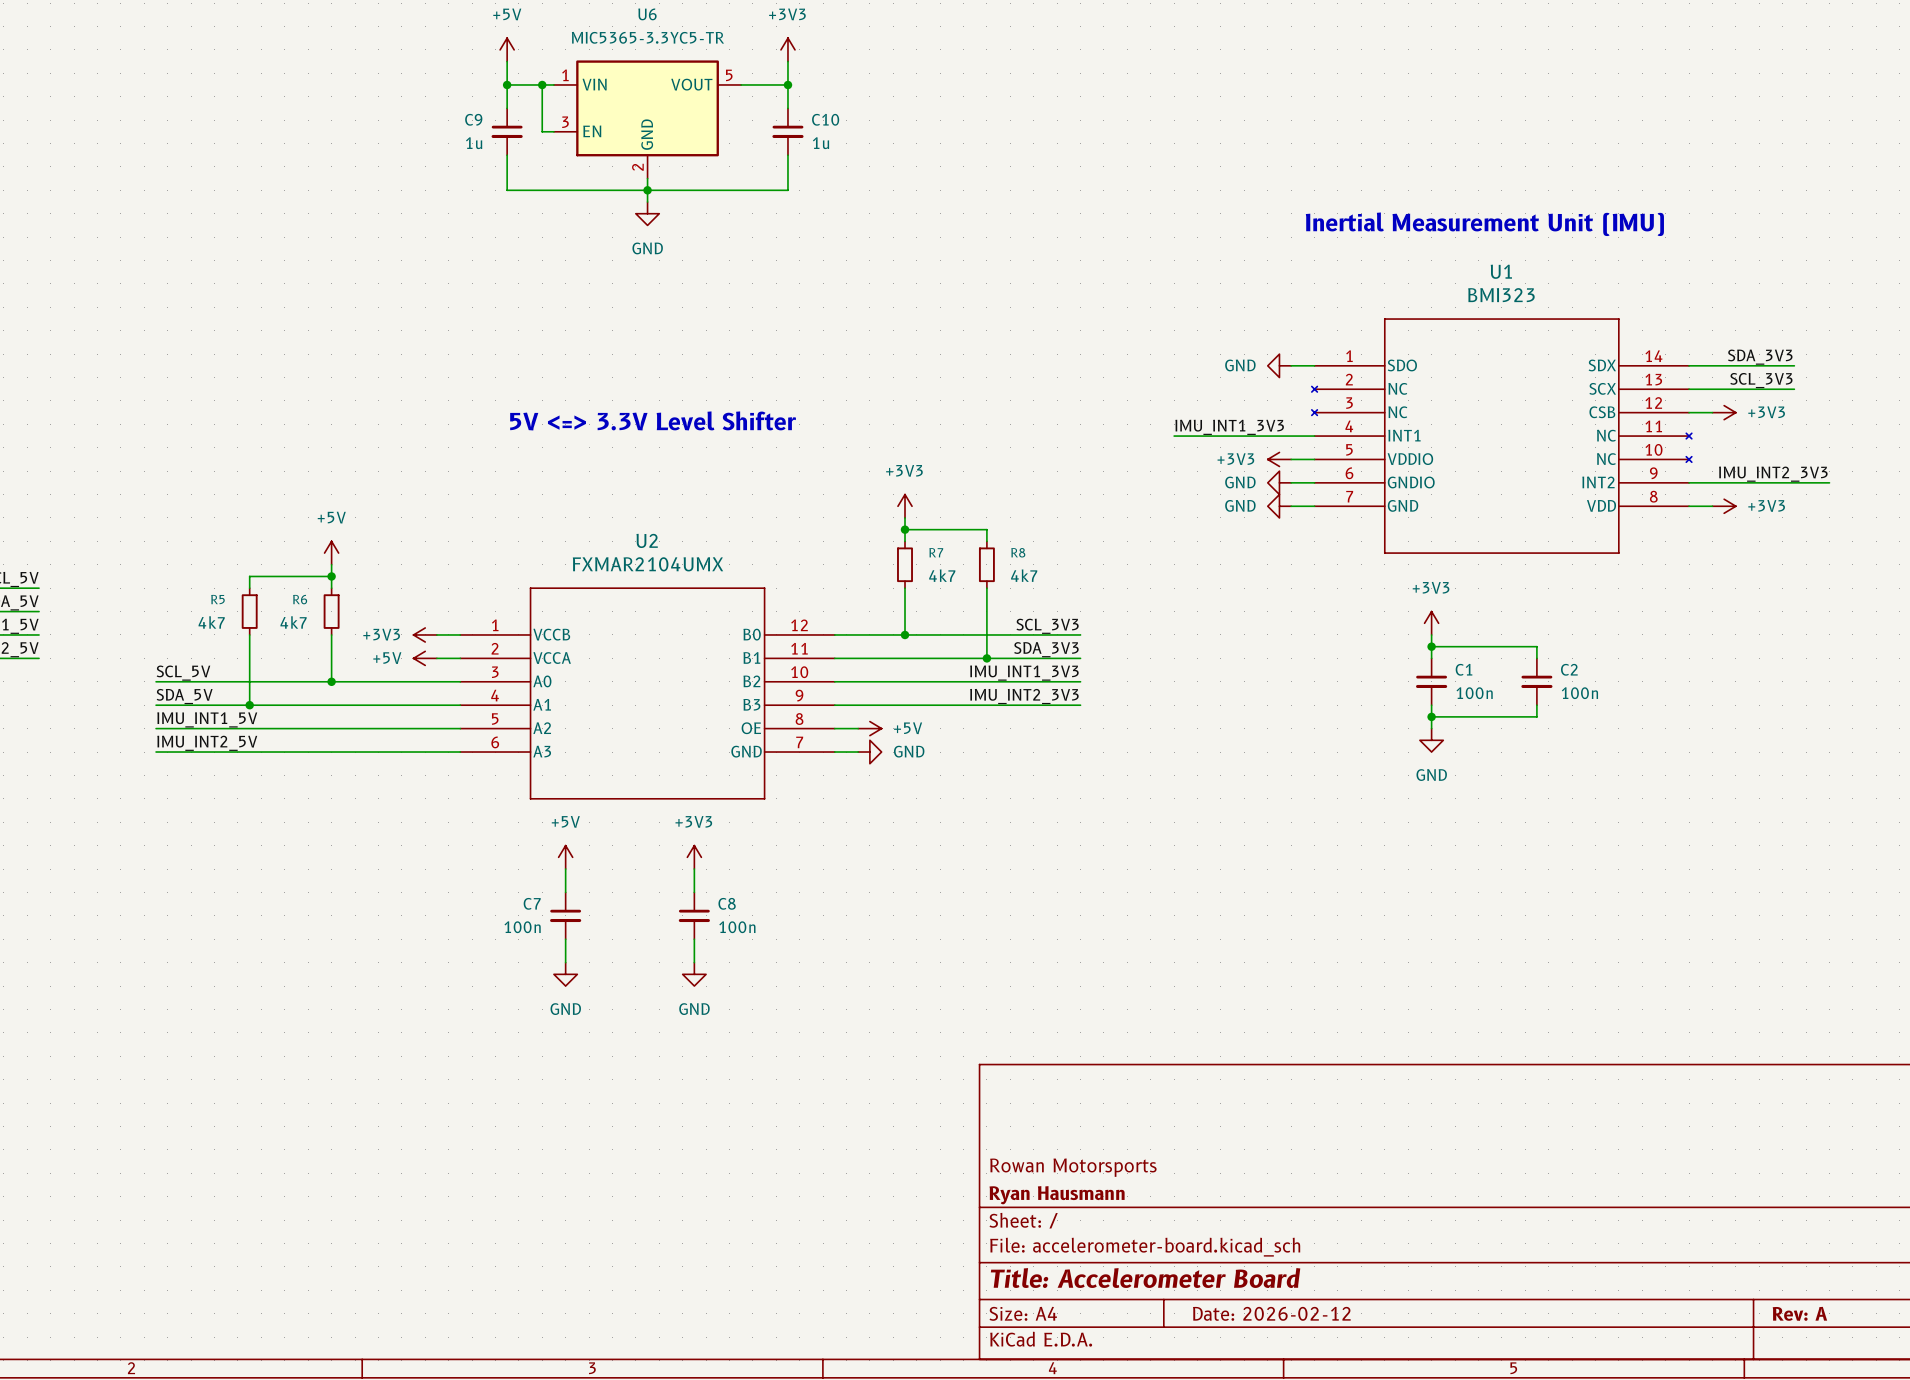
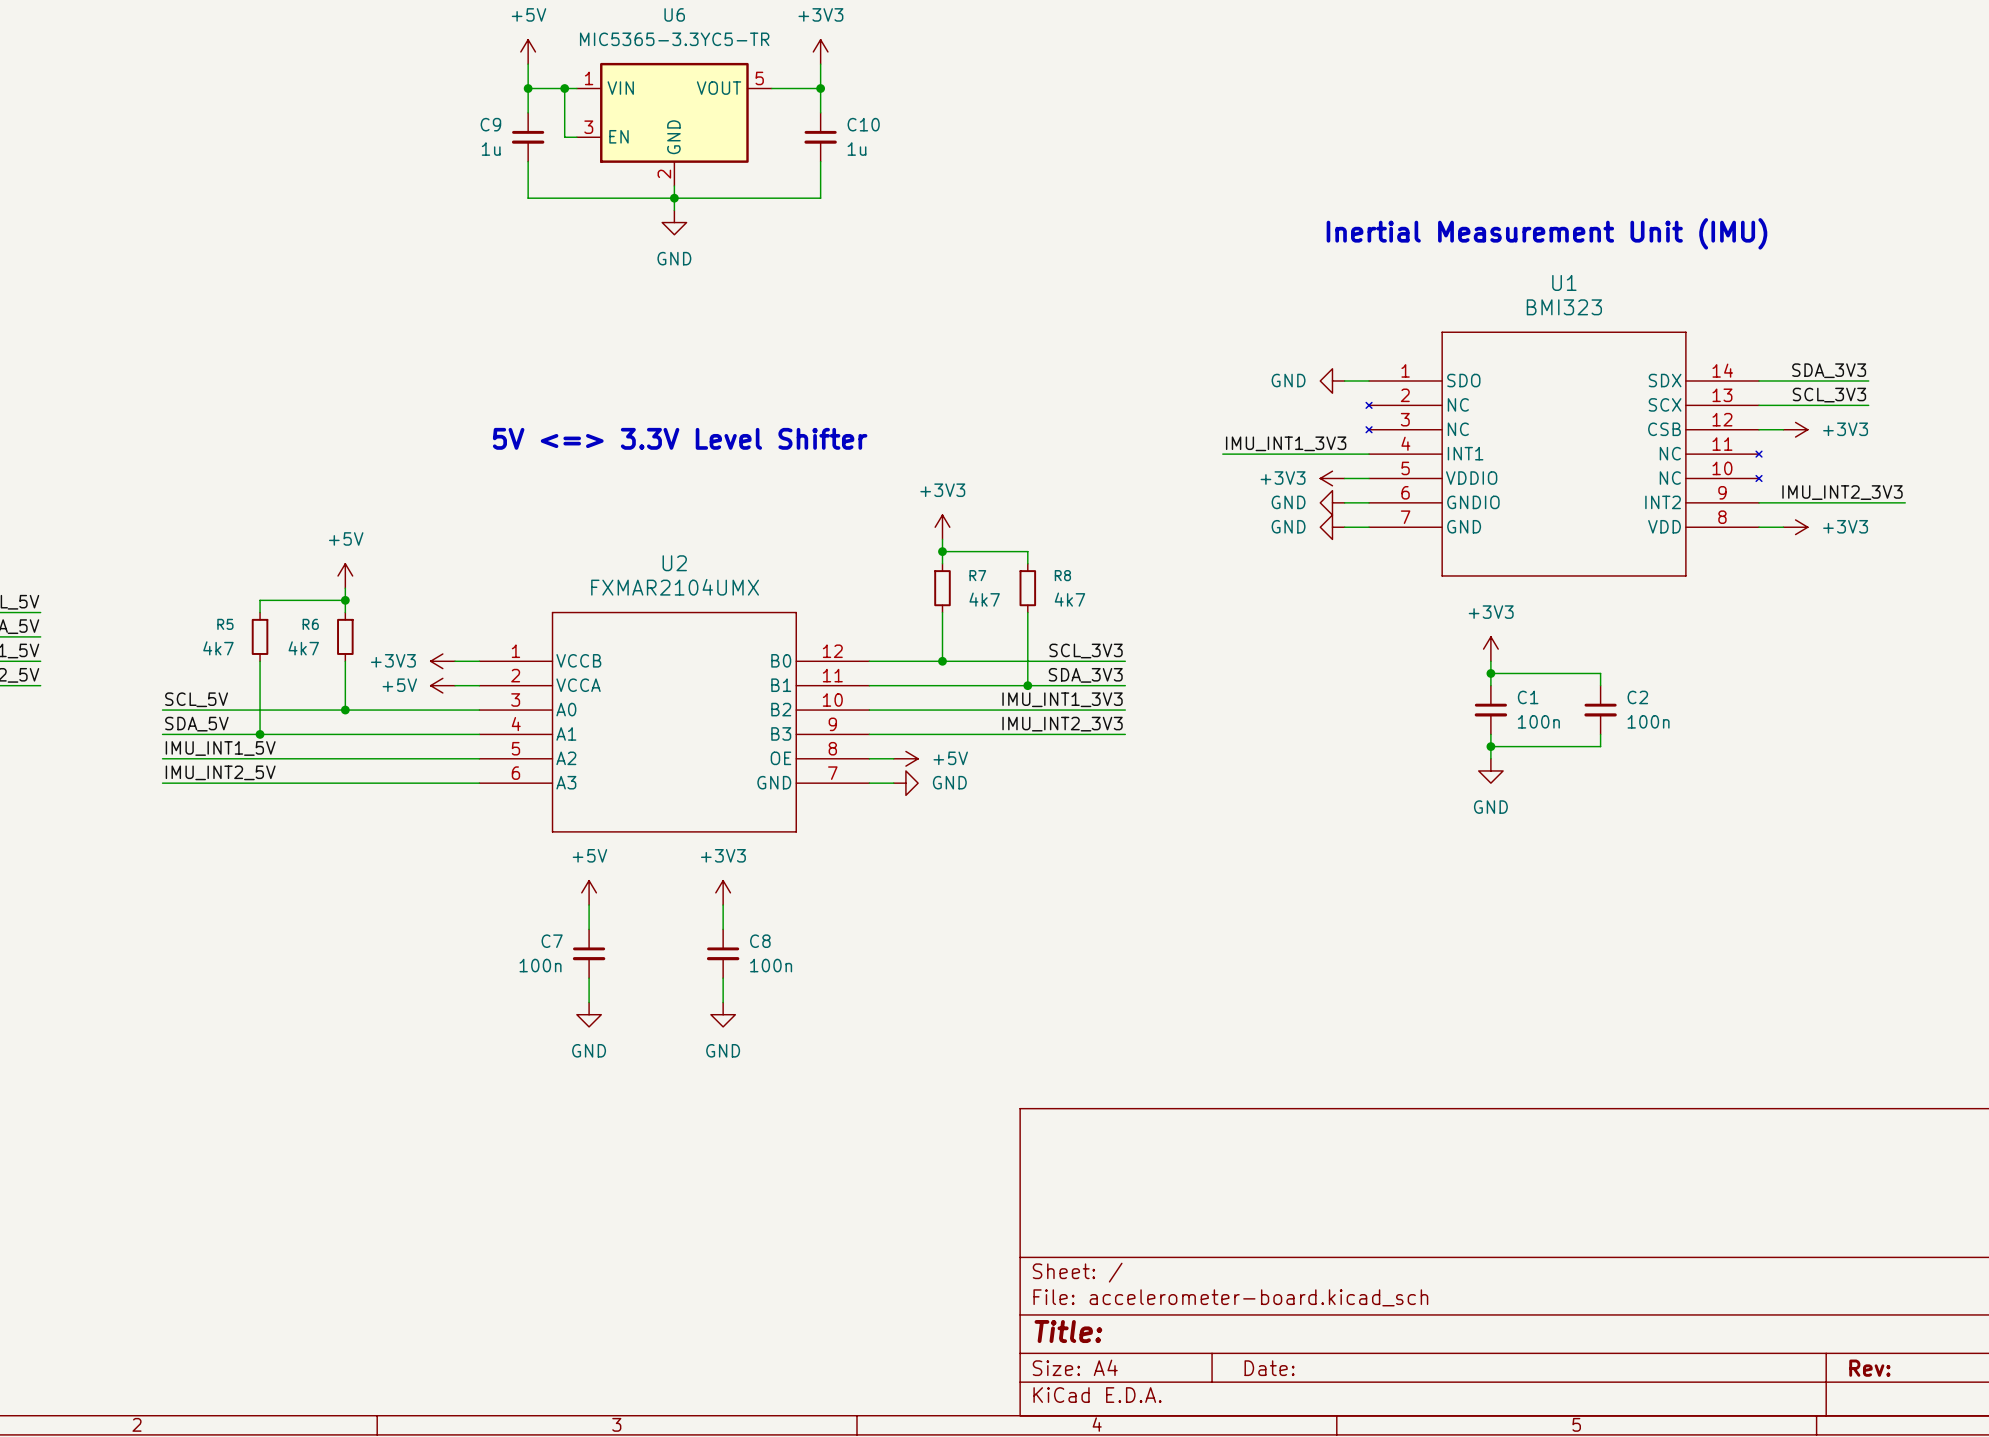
title block: Rowan Motorsports (1073, 1167) -> none
title block: Ryan Hausmann (1057, 1195) -> none
title block: Title: Accelerometer Board (1145, 1278) -> Title: (1068, 1331)
title block: Date: 2026-02-12 (1271, 1313) -> Date: (1269, 1368)
title block: Rev: A (1799, 1313) -> Rev: (1869, 1368)

